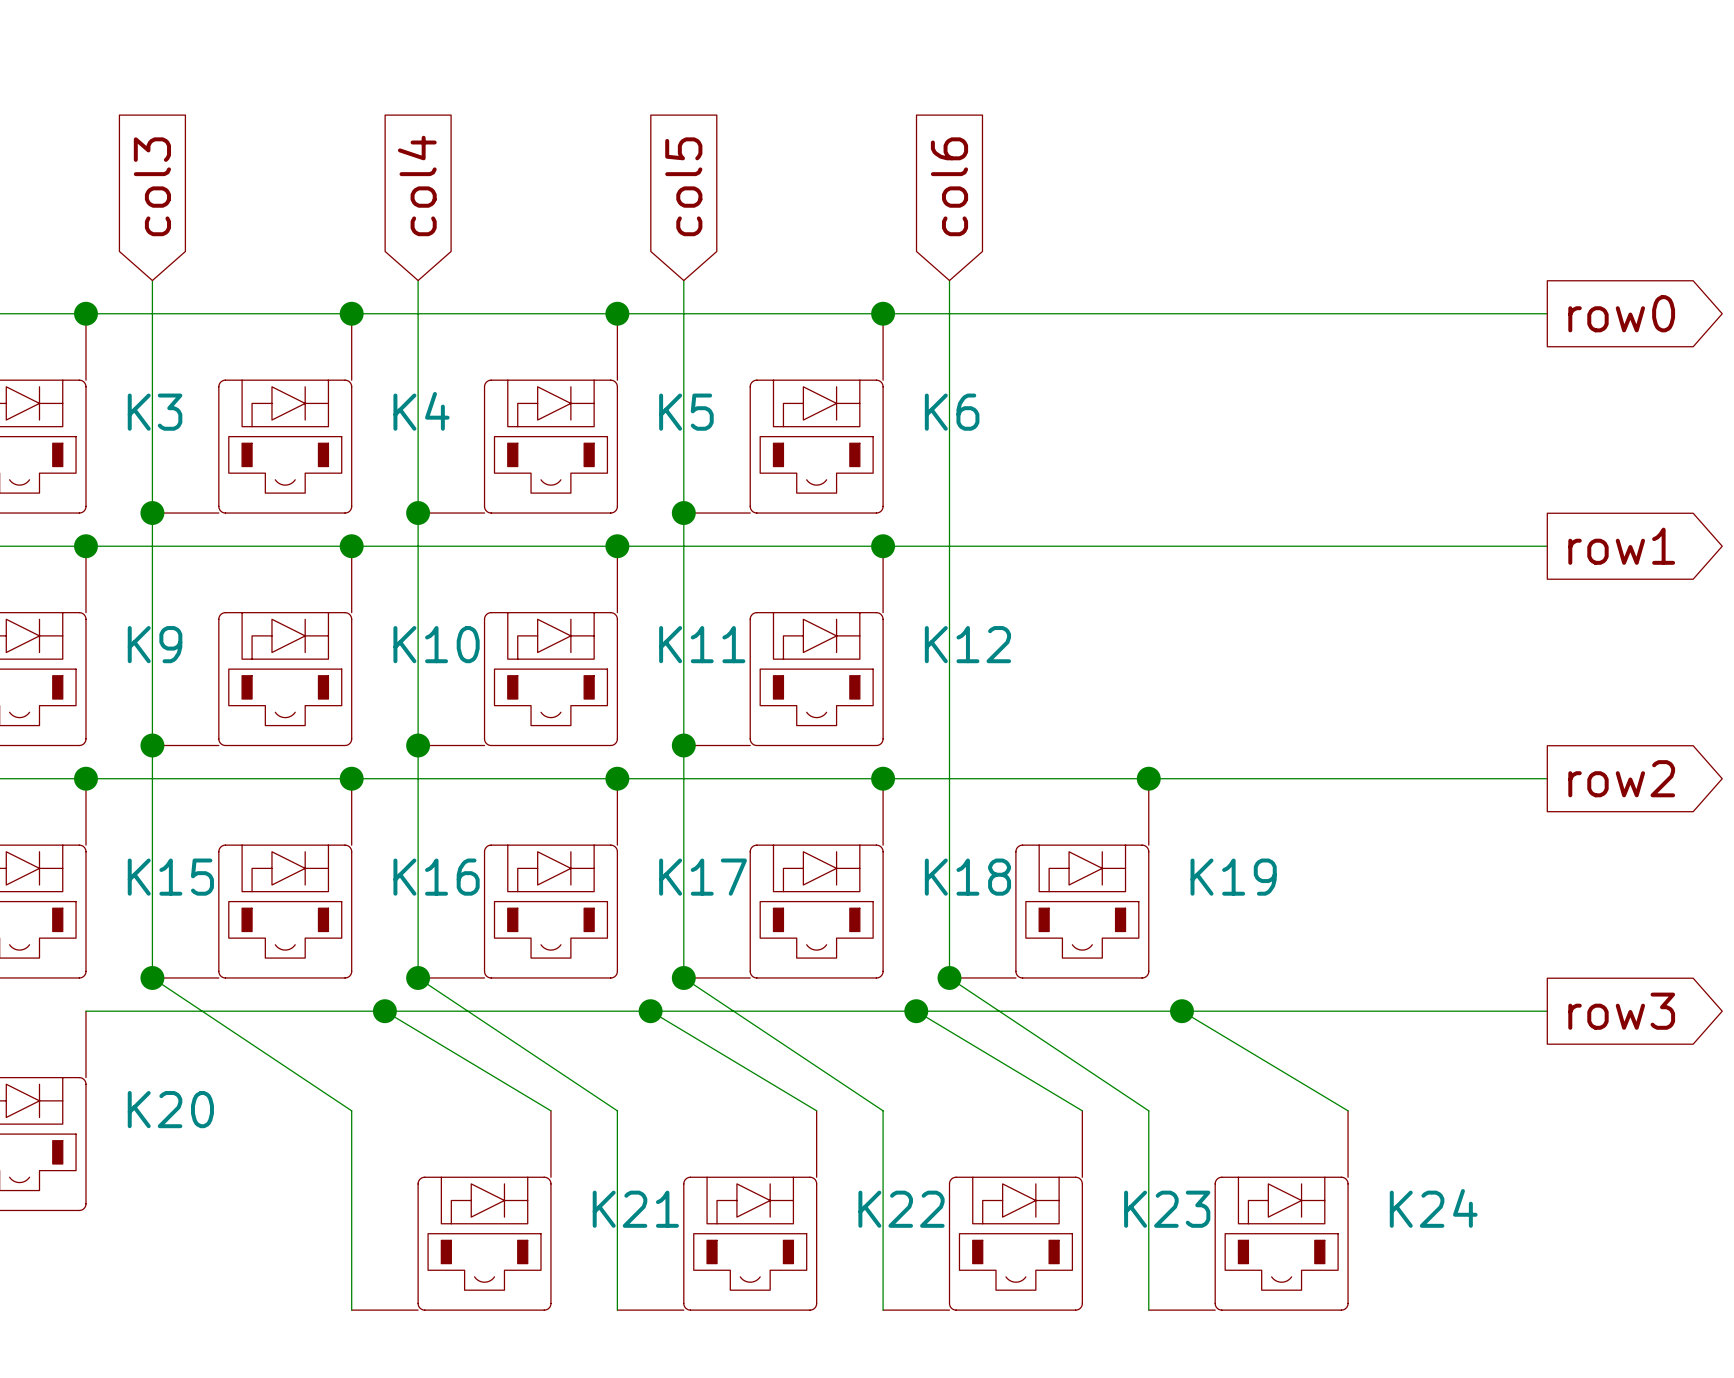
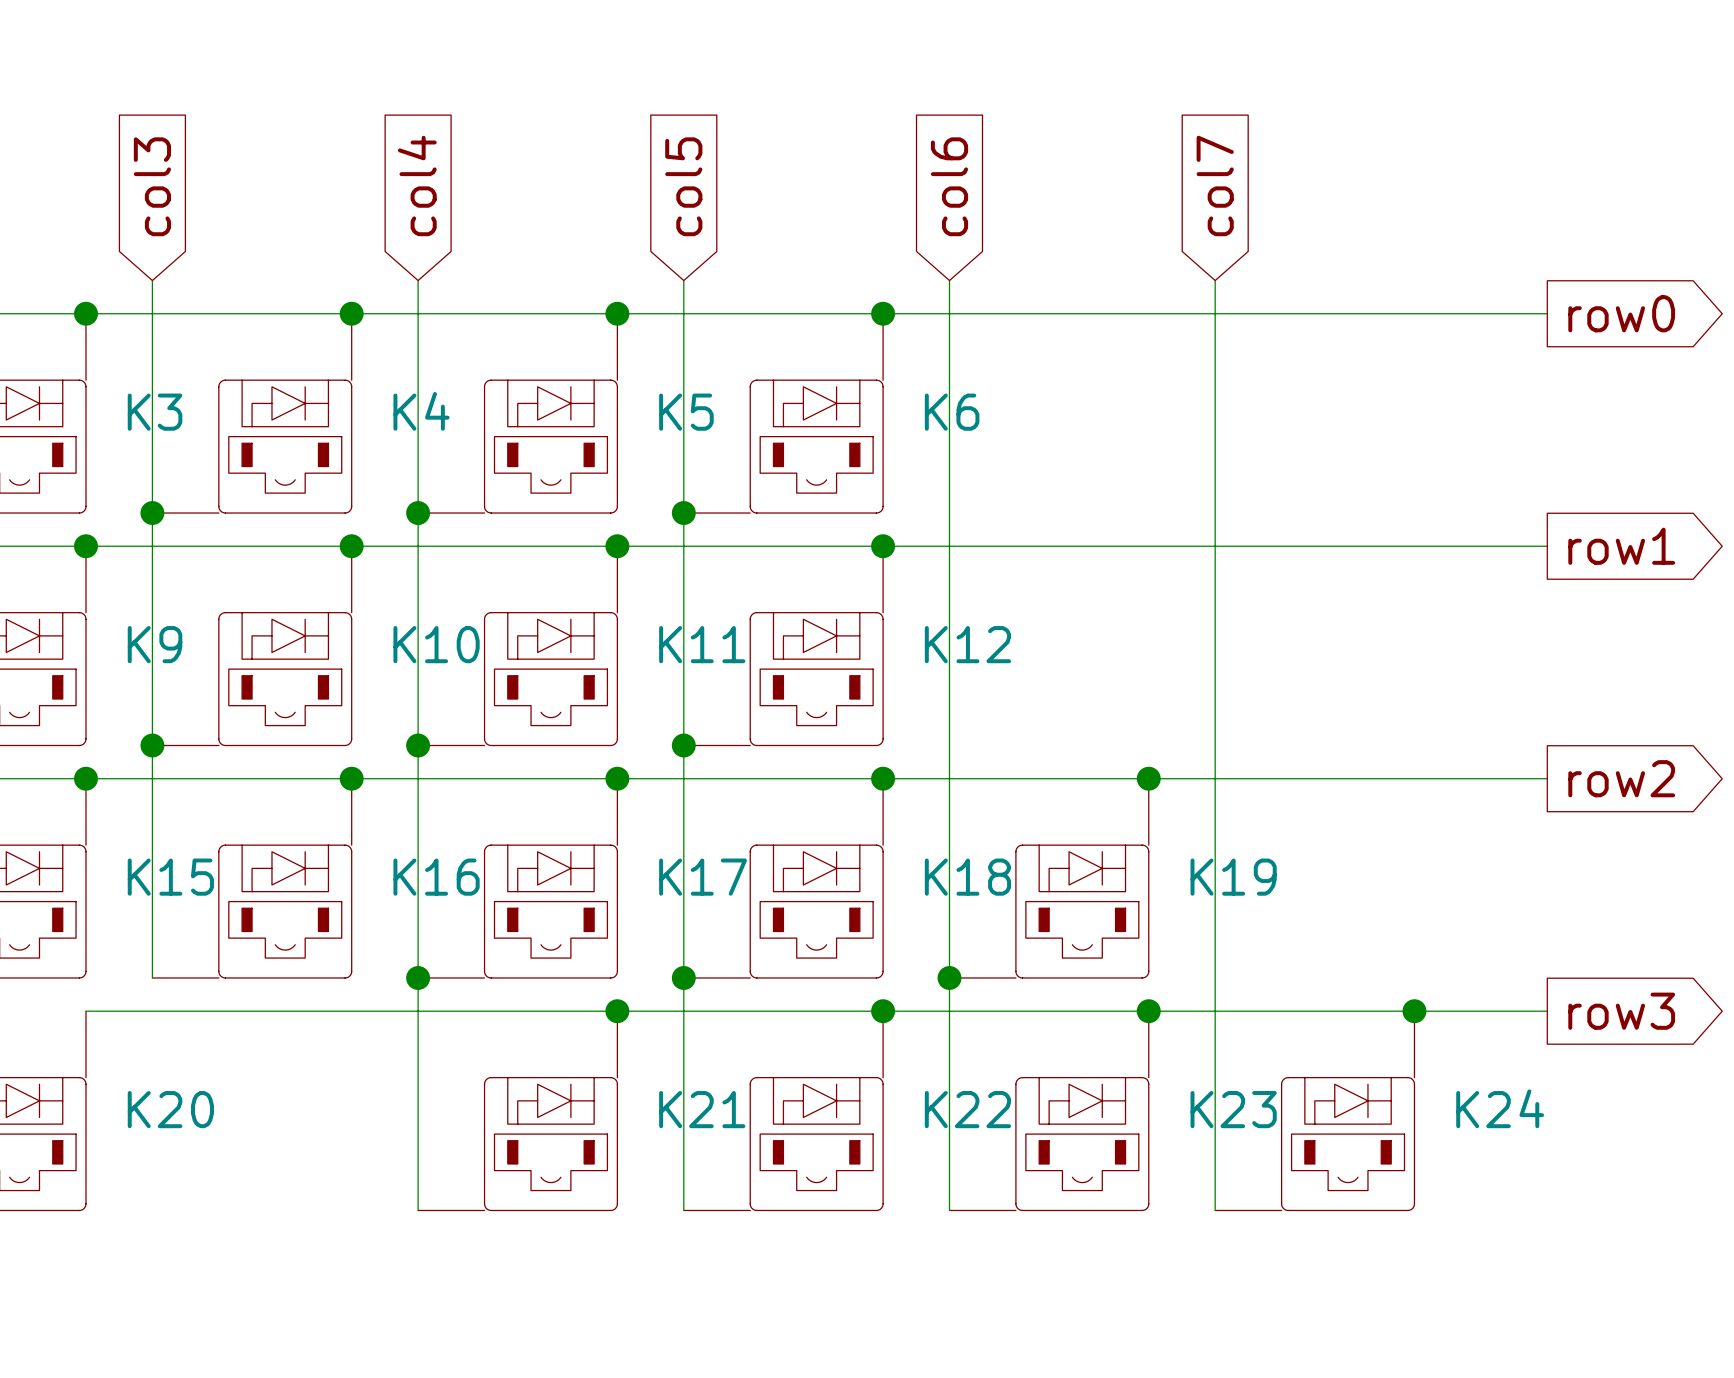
global label: none -> col7 (1215, 185)
wire: none -> (1215, 280) (1215, 1210)
wire: (152, 977) (351, 1110) (351, 1310) -> none
junction: (152, 977) -> none
wire: (418, 977) (617, 1110) (617, 1310) -> (418, 977) (418, 1210)
wire: (683, 977) (883, 1110) (883, 1310) -> (683, 977) (683, 1210)
wire: (949, 977) (1148, 1110) (1148, 1310) -> (949, 977) (949, 1210)
wire: (384, 1011) (550, 1110) -> none
junction: (384, 1011) -> none
wire: (650, 1011) (816, 1110) -> none
junction position: (650, 1011) -> (617, 1011)
wire: (916, 1011) (1082, 1110) -> none
junction position: (916, 1011) -> (883, 1011)
wire: (1181, 1011) (1348, 1110) -> none
junction position: (1181, 1011) -> (1148, 1011)
junction: none -> (1414, 1011)
K21 position: (451, 1210) -> (517, 1110)
K22 position: (717, 1210) -> (783, 1110)
K23 position: (982, 1210) -> (1049, 1110)
K24 position: (1248, 1210) -> (1314, 1110)

